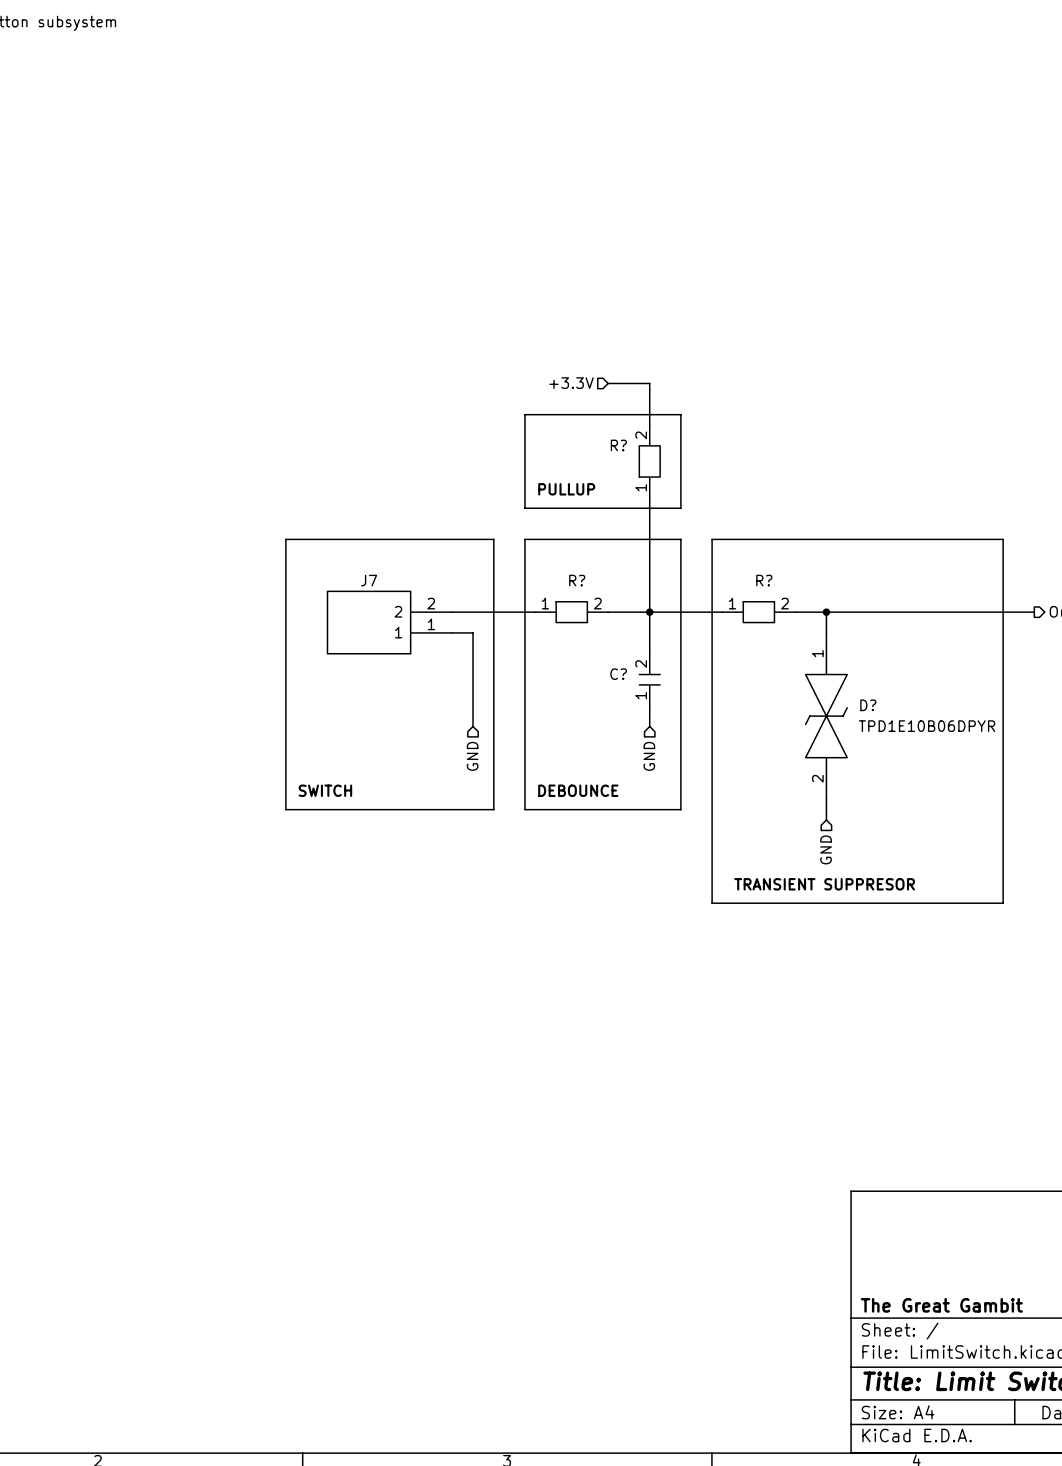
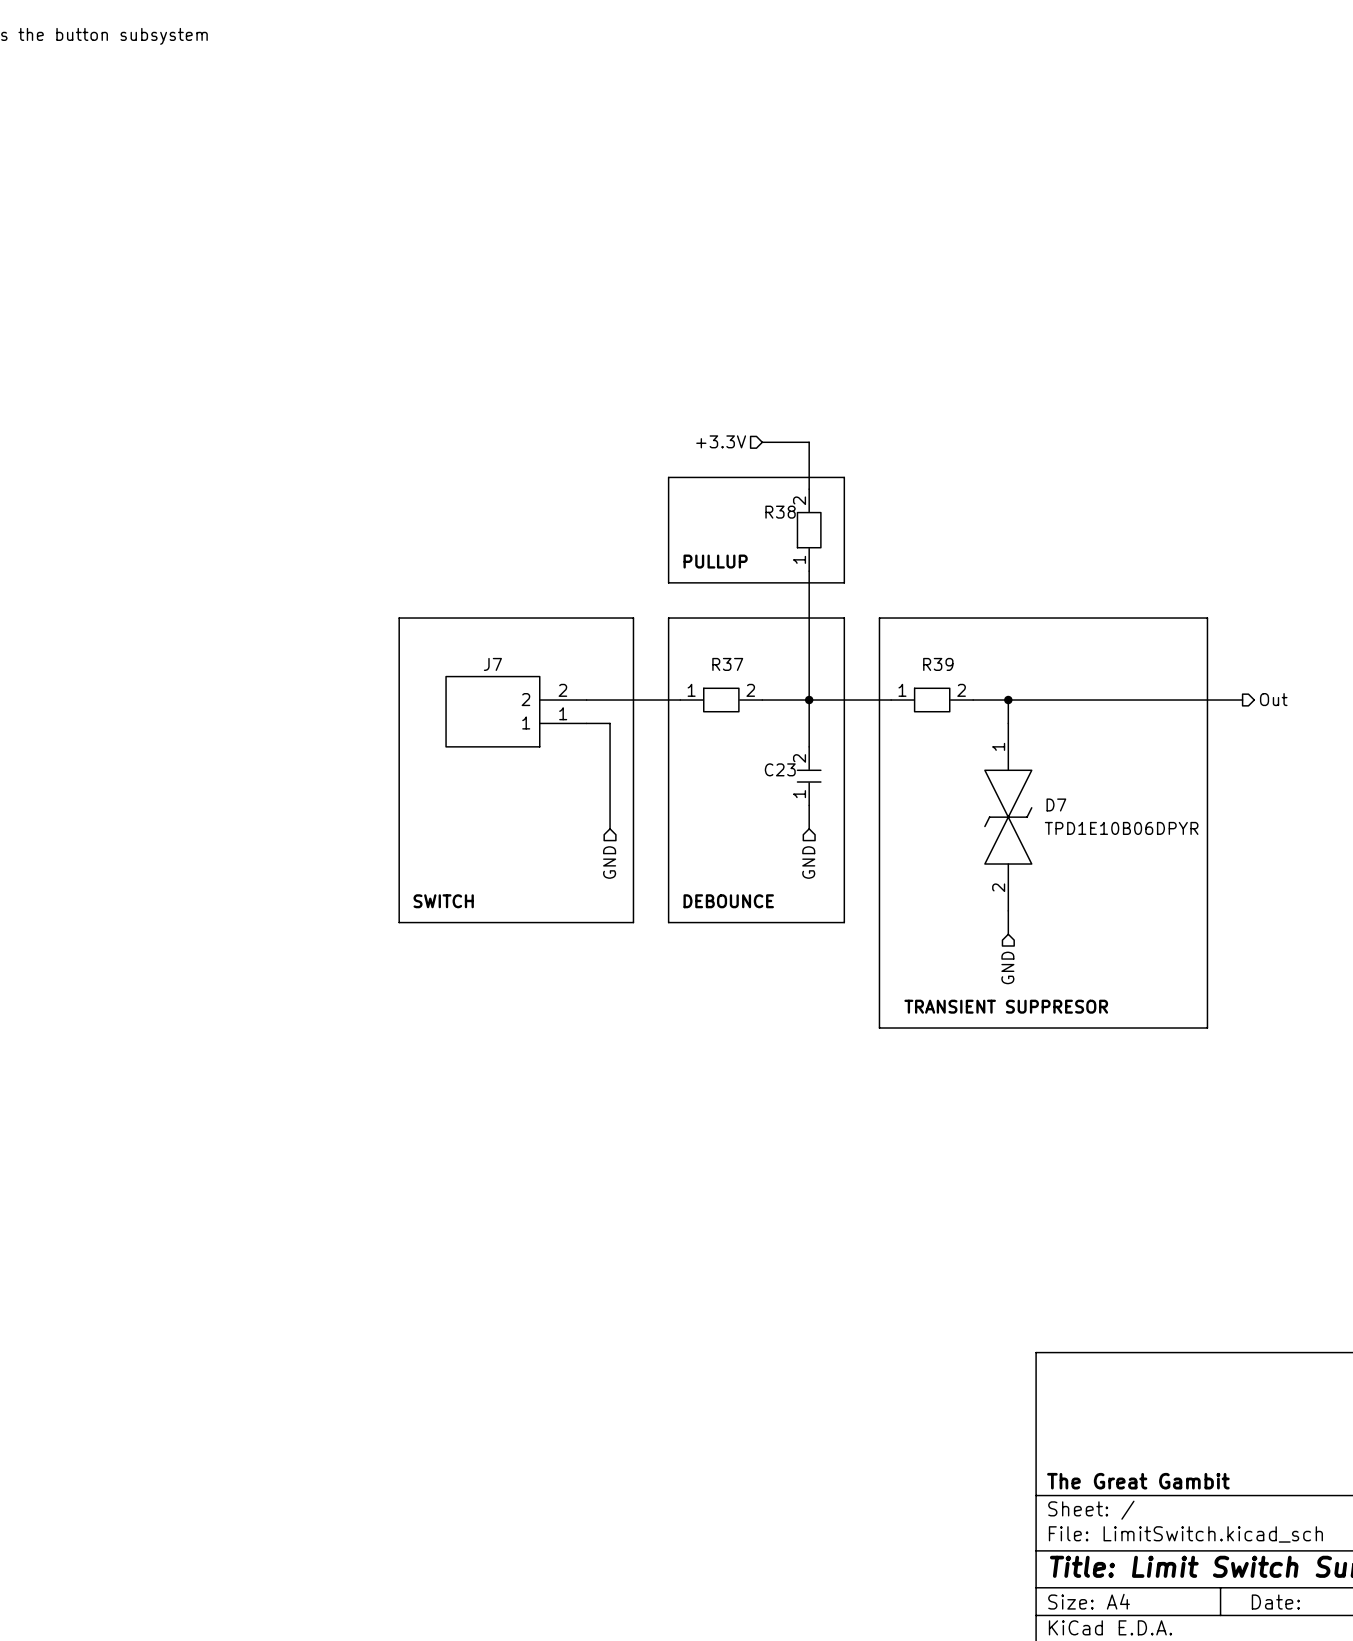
R? name: R? (618, 445) -> R38 (780, 512)
R? name: R? (577, 580) -> R37 (727, 664)
R? name: R? (764, 580) -> R39 (938, 664)
C? name: C? (618, 674) -> C23 (780, 769)
D? name: D? (868, 705) -> D7 (1056, 804)

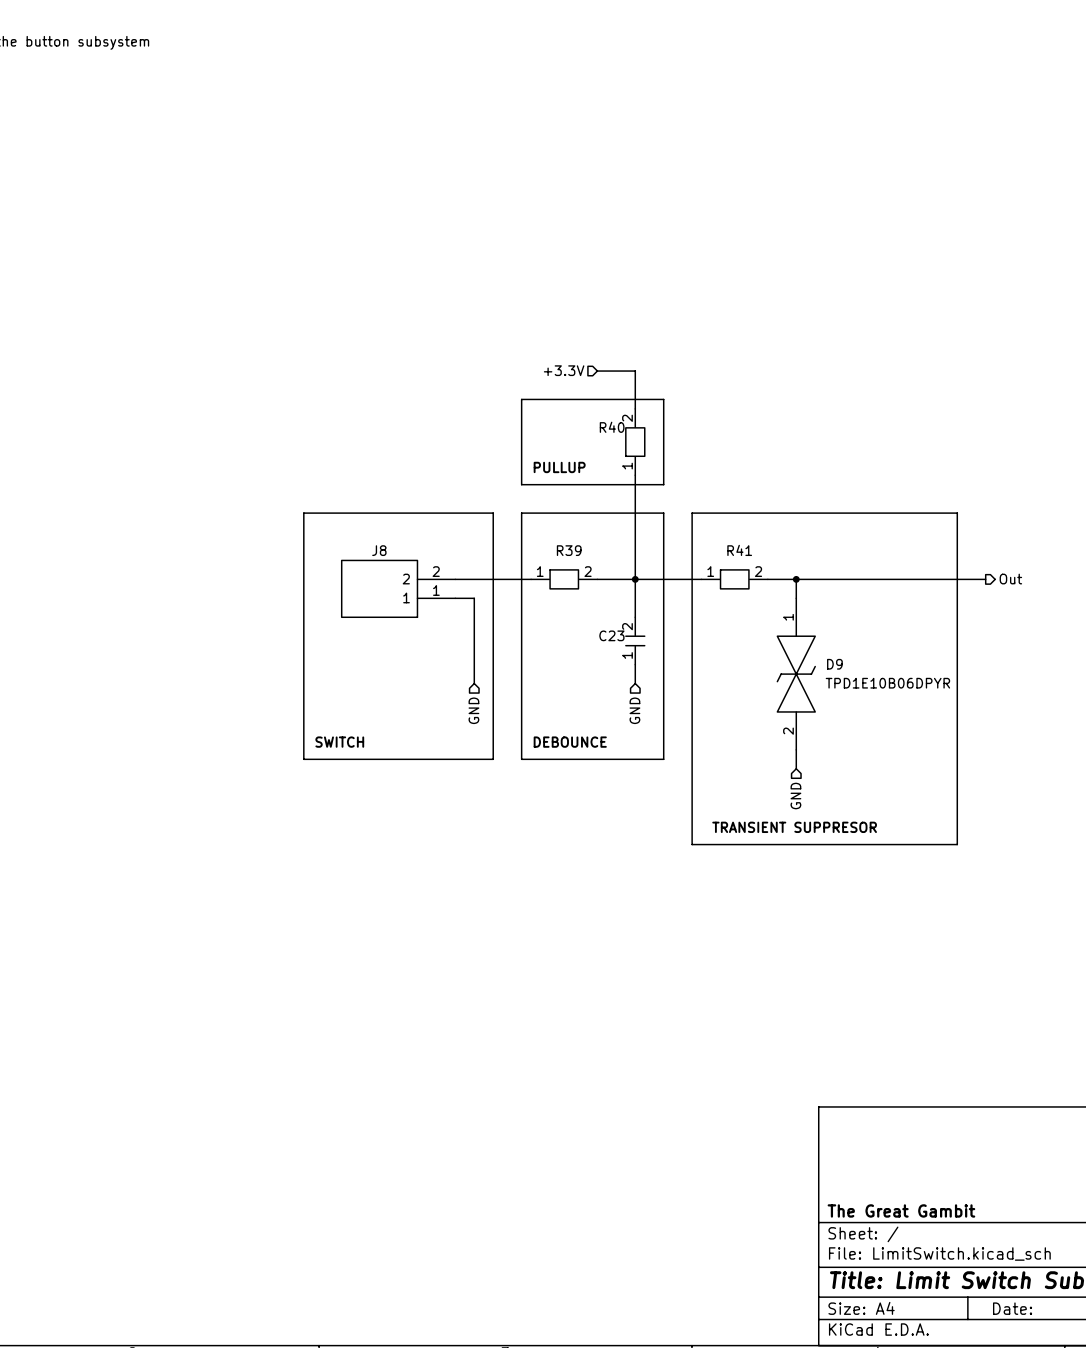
R38 name: R38 (780, 512) -> R40 (612, 427)
J7 name: J7 (492, 664) -> J8 (379, 550)
R37 name: R37 (727, 664) -> R39 (569, 550)
R39 name: R39 (938, 664) -> R41 (739, 550)
D7 name: D7 (1056, 804) -> D9 (834, 664)

